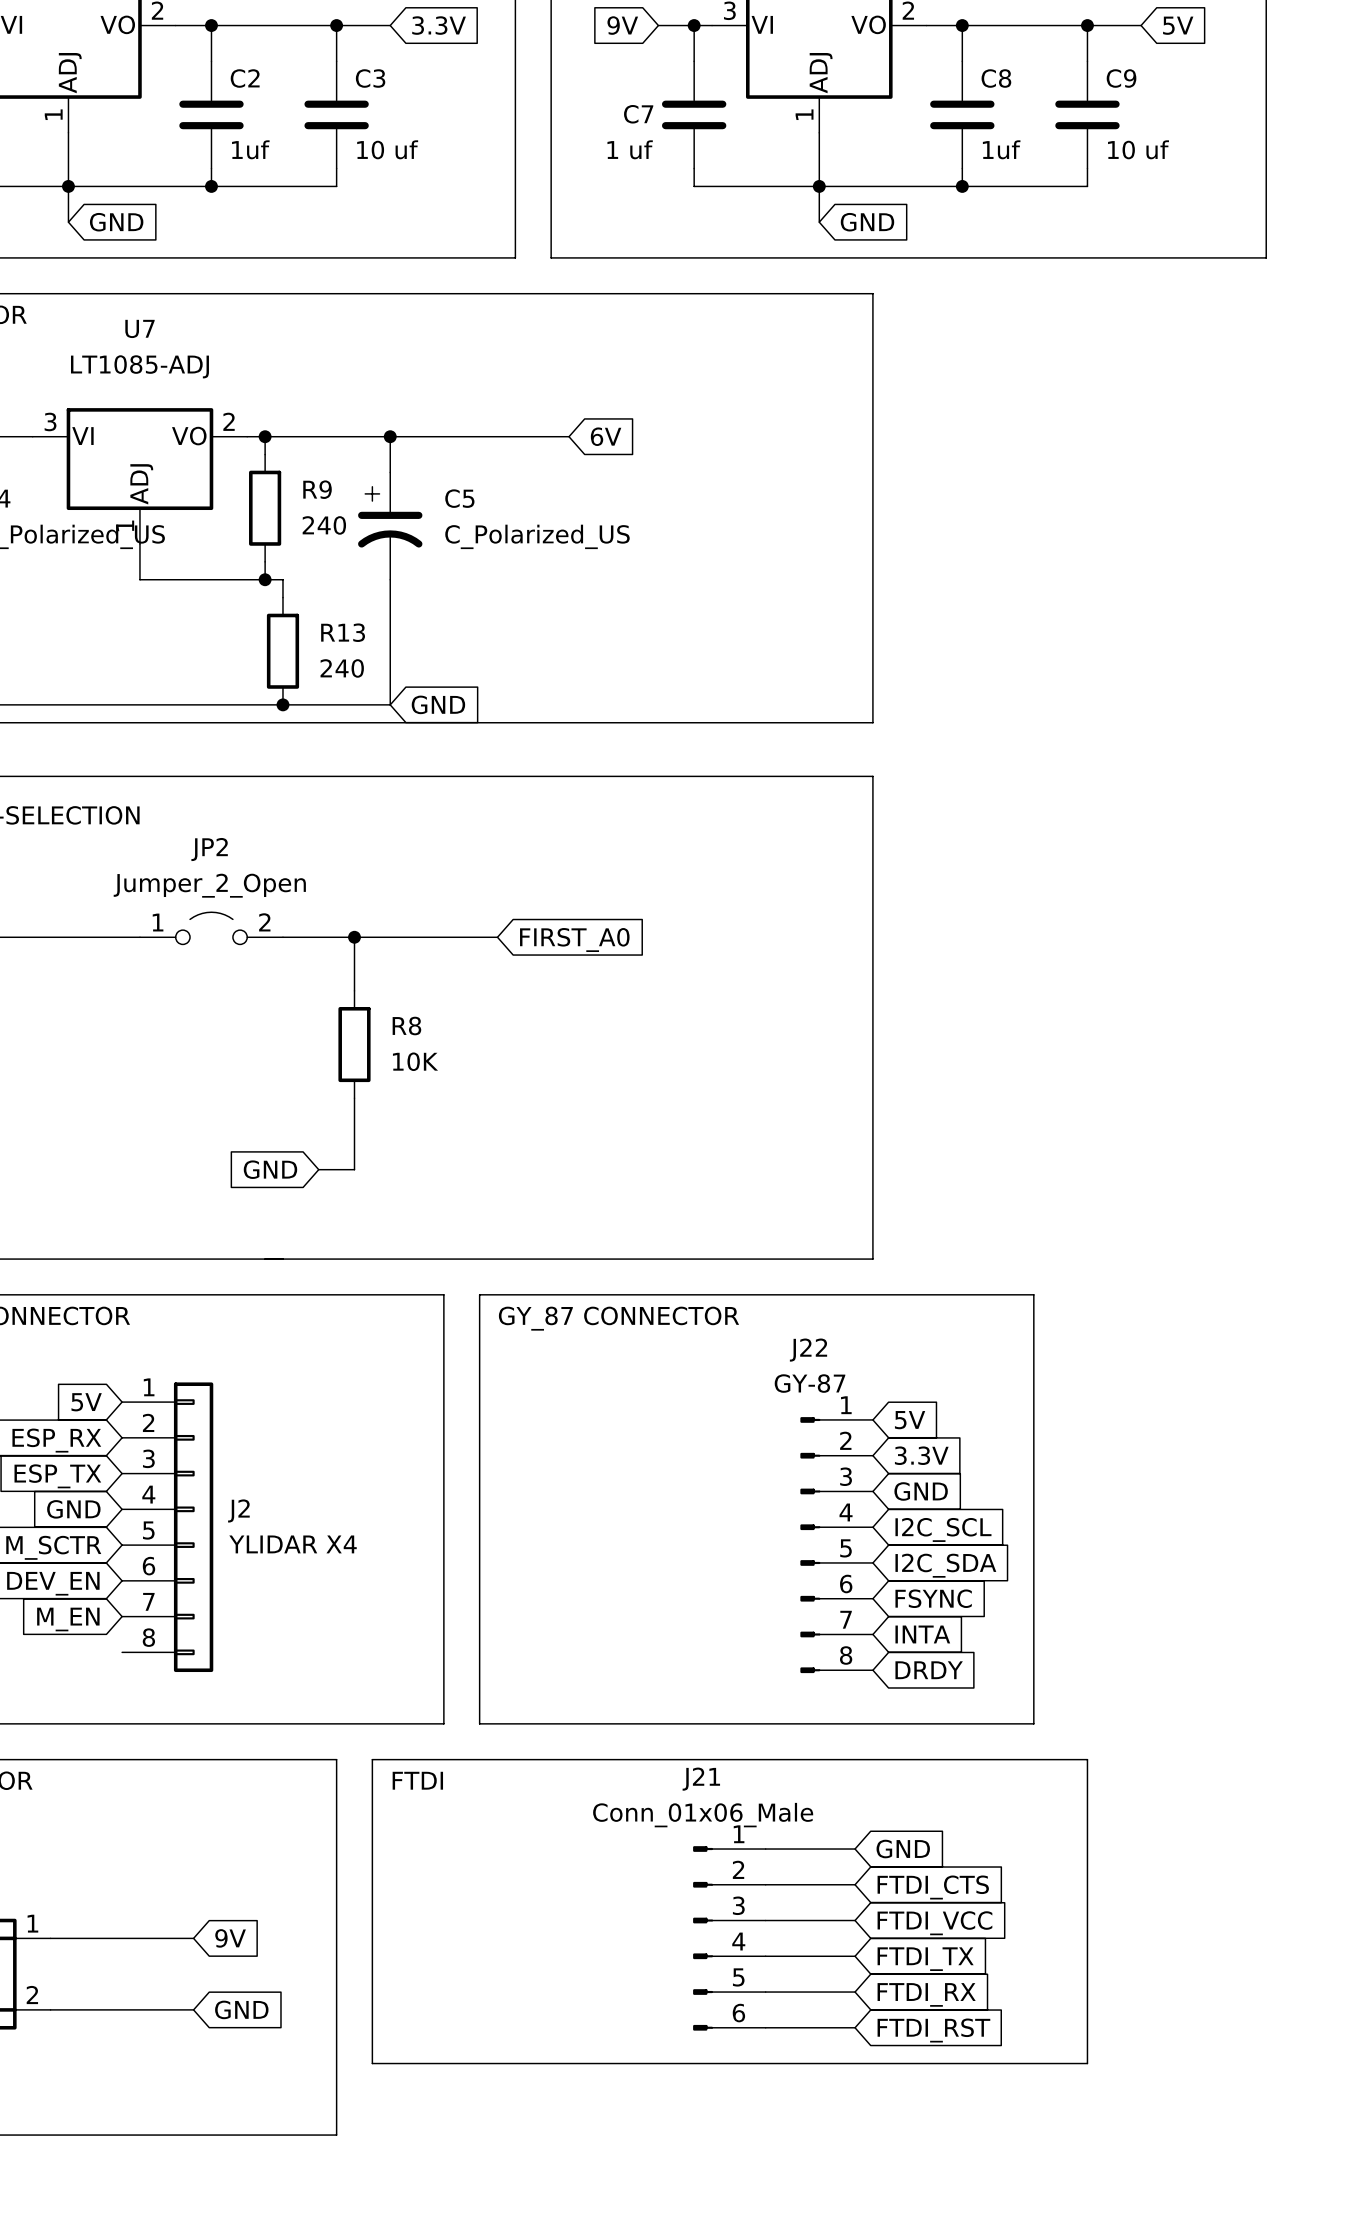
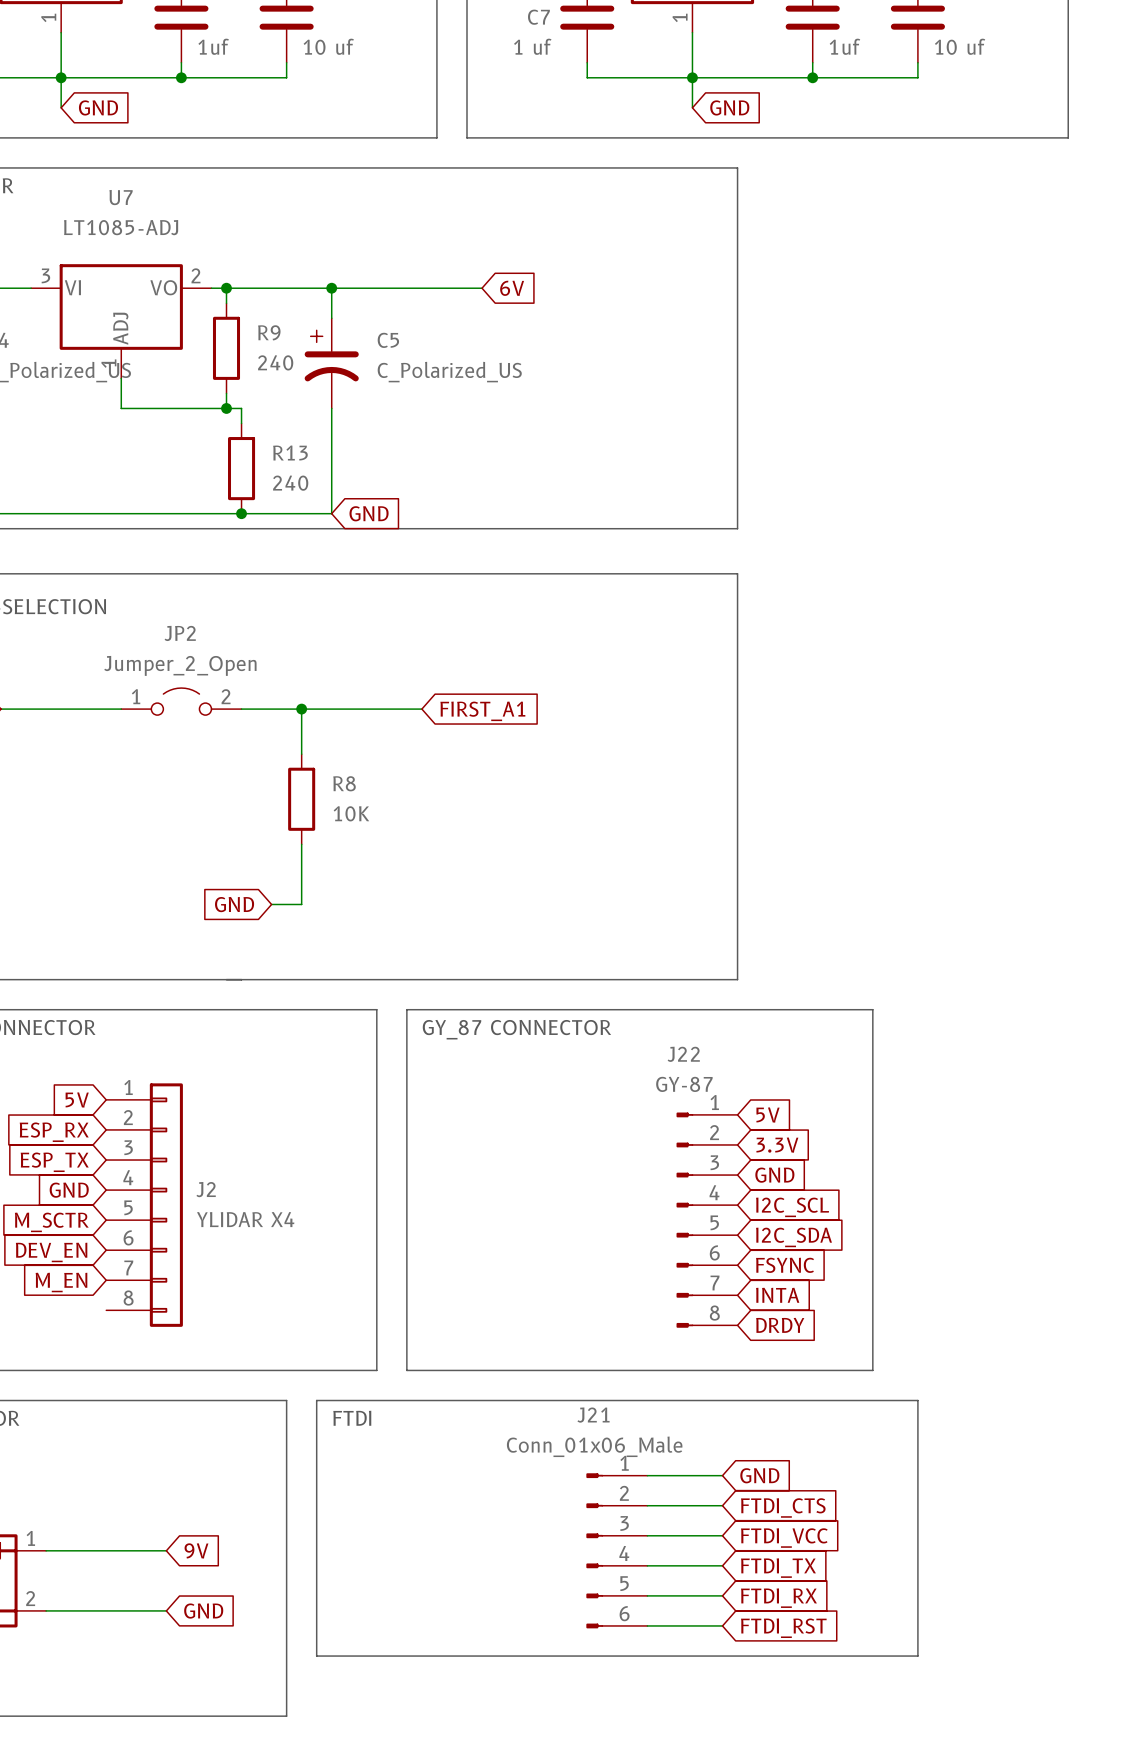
global label: FIRST_A0 (574, 940) -> FIRST_A1 (482, 711)

